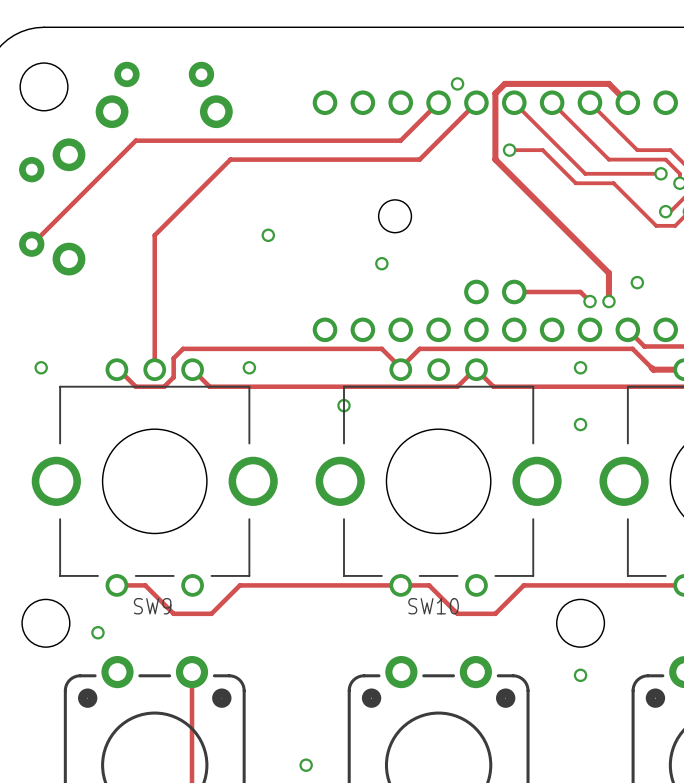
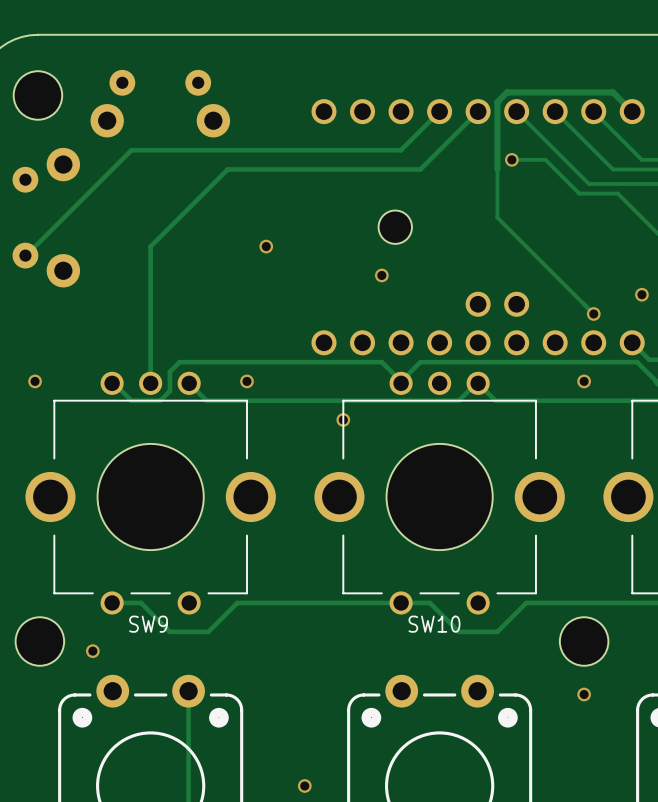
via: (457, 83) -> none
track: (495, 159) (608, 273) (608, 301) -> (497, 169) (497, 217) (584, 304)
track: (514, 291) (580, 291) -> none
via: (608, 301) -> none
via: (580, 424) -> none

